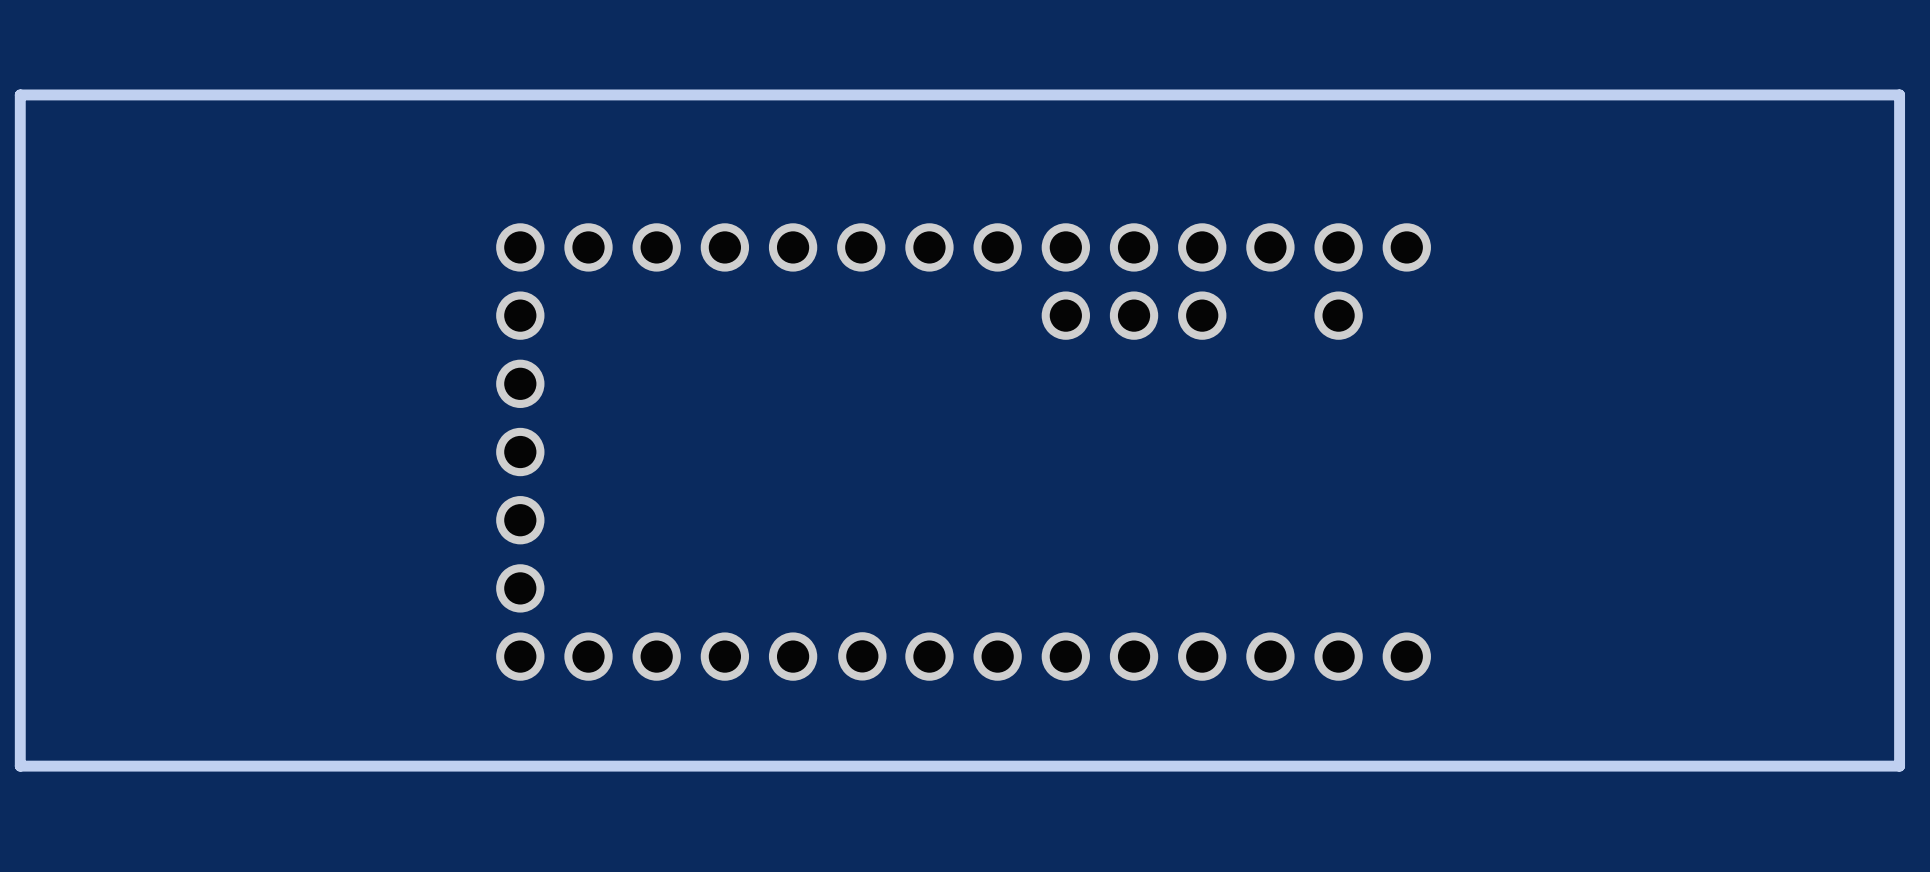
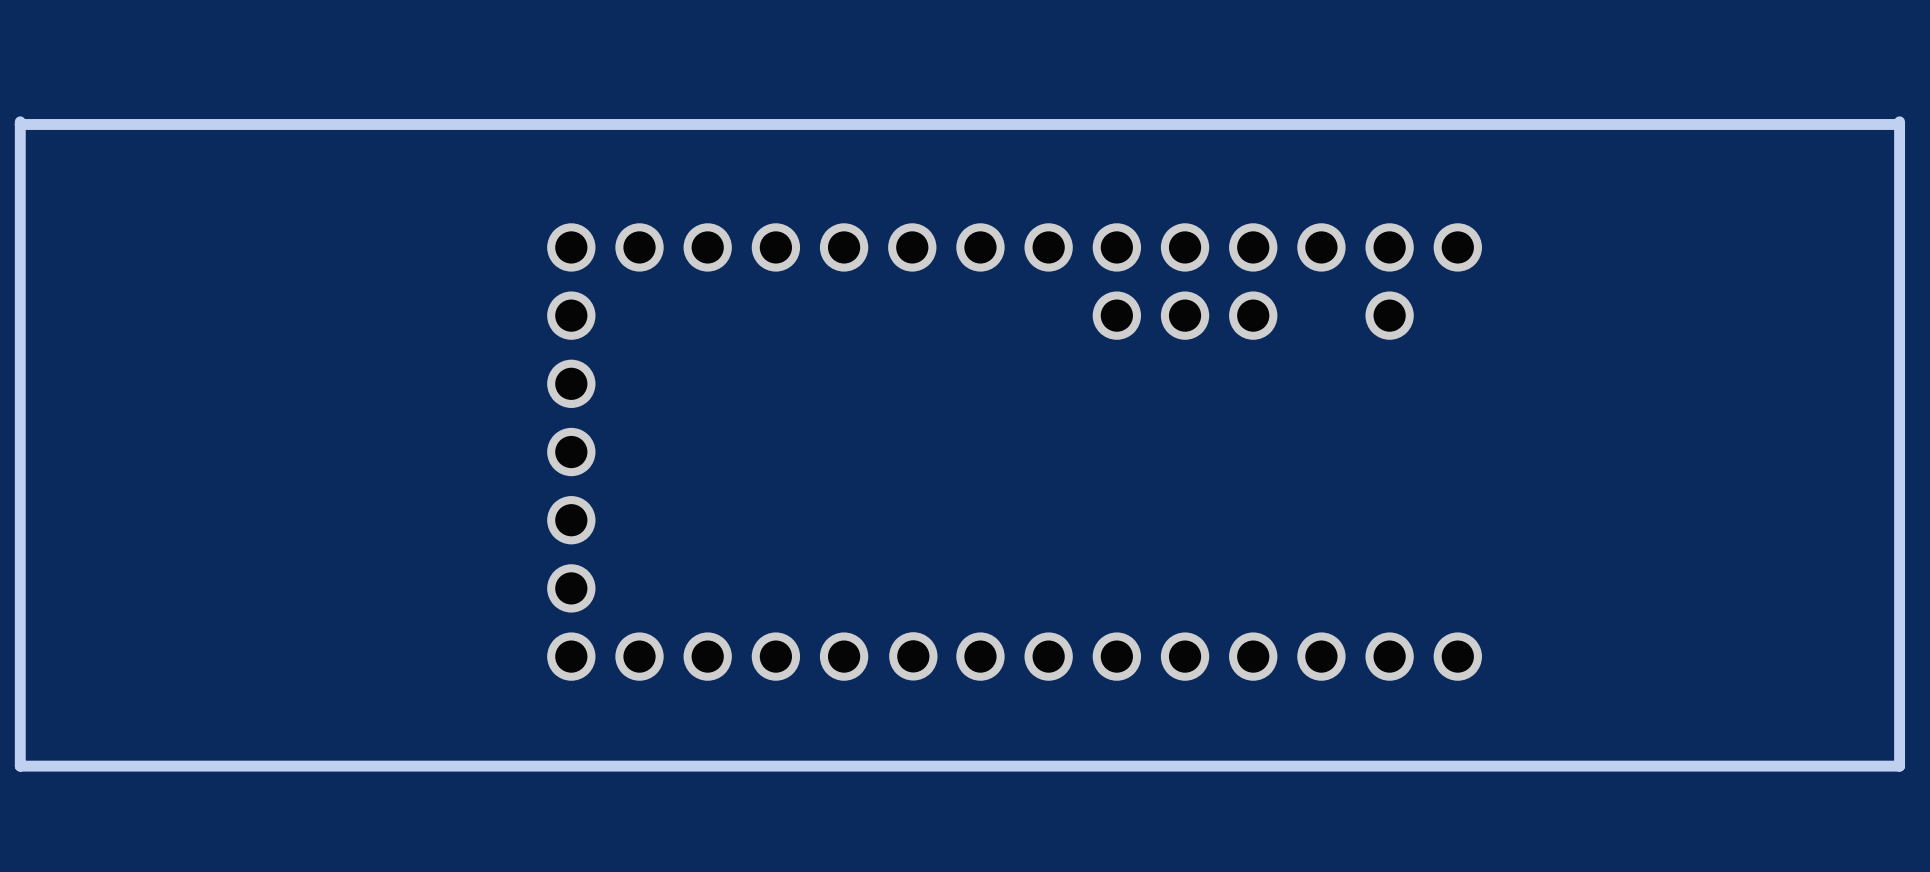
board edge: (1899, 121) (1899, 94) (20, 94) (20, 121) -> none
board edge: none -> (1896, 124) (20, 124)
part position: (963, 452) -> (1014, 452)

